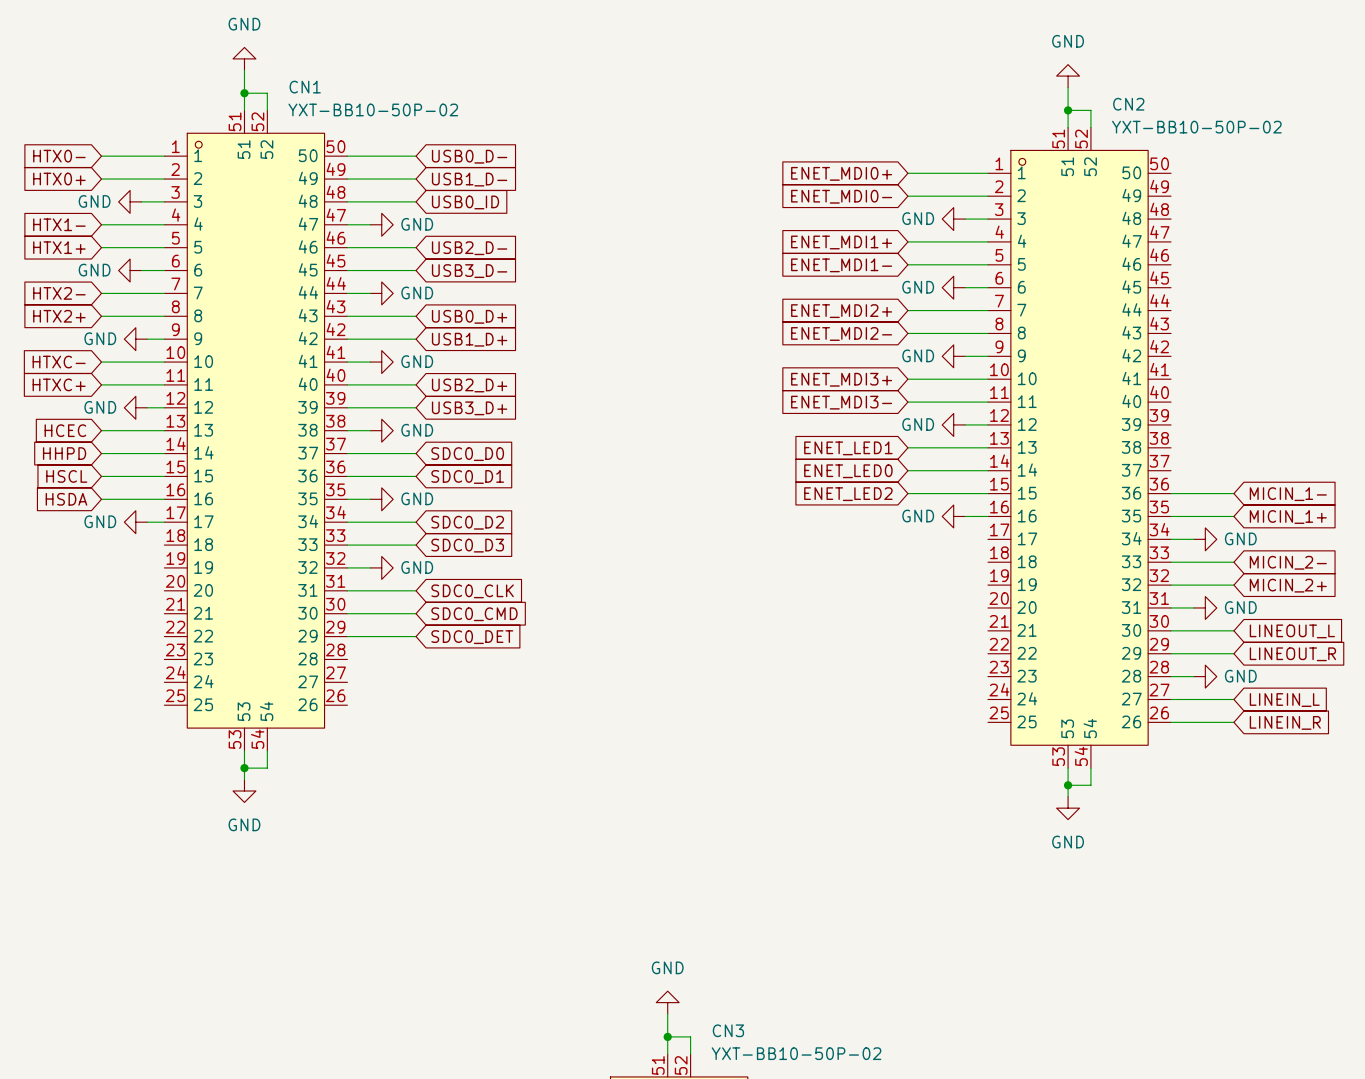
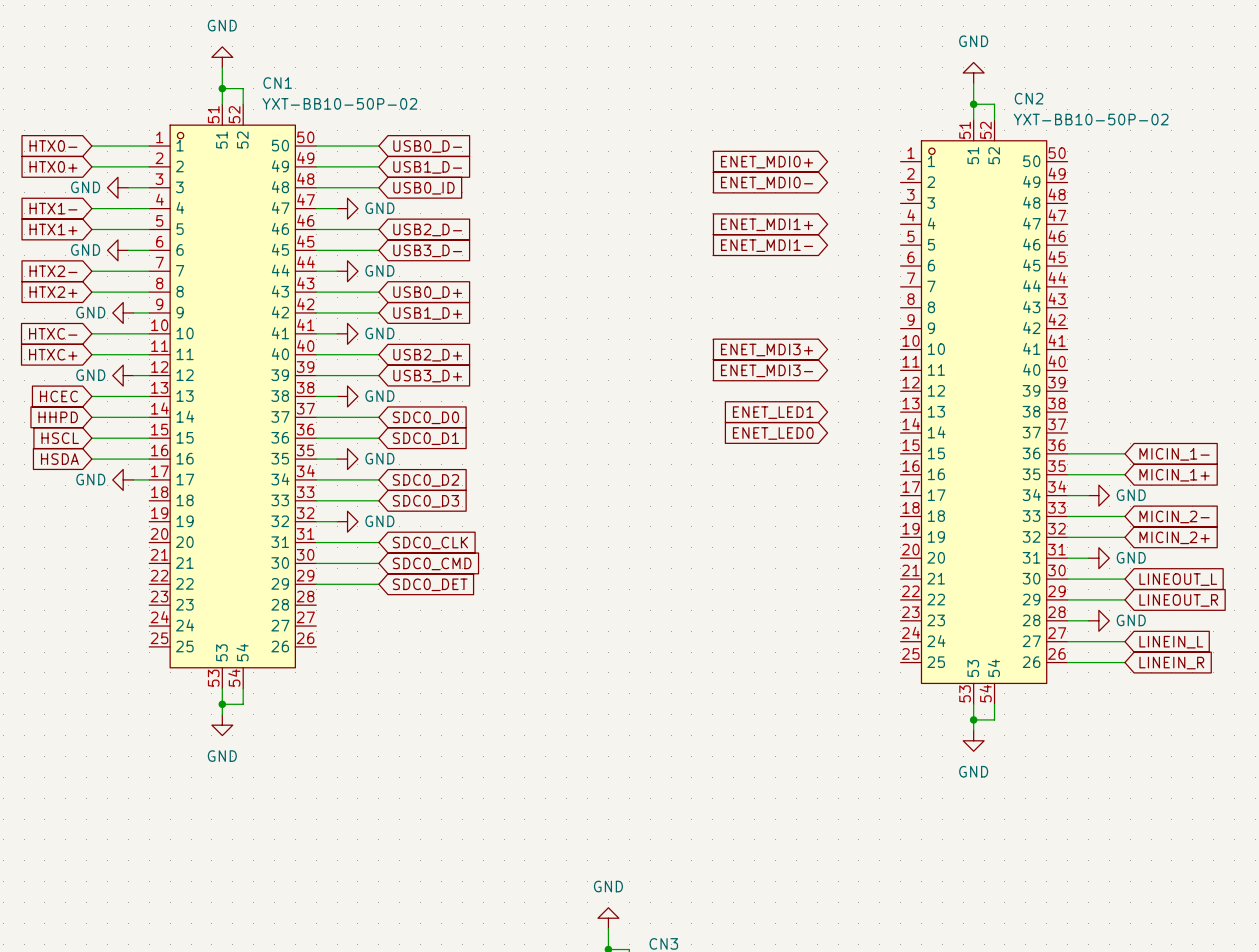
wire: (907, 173) (987, 173) -> none
wire: (907, 196) (987, 196) -> none
power symbol: GND (953, 219) -> none
wire: (965, 219) (987, 219) -> none
wire: (907, 241) (987, 241) -> none
wire: (907, 264) (987, 264) -> none
power symbol: GND (953, 287) -> none
wire: (965, 287) (987, 287) -> none
wire: (907, 310) (987, 310) -> none
global label: ENET_MDI2+ (841, 311) -> none
global label: ENET_MDI2- (841, 333) -> none
wire: (907, 333) (987, 333) -> none
power symbol: GND (953, 356) -> none
wire: (965, 356) (987, 356) -> none
wire: (907, 379) (987, 379) -> none
wire: (907, 402) (987, 402) -> none
power symbol: GND (953, 424) -> none
wire: (965, 424) (987, 424) -> none
wire: (907, 447) (987, 447) -> none
wire: (907, 470) (987, 470) -> none
wire: (907, 493) (987, 493) -> none
global label: ENET_LED2 (848, 494) -> none
power symbol: GND (953, 516) -> none
wire: (965, 516) (987, 516) -> none

